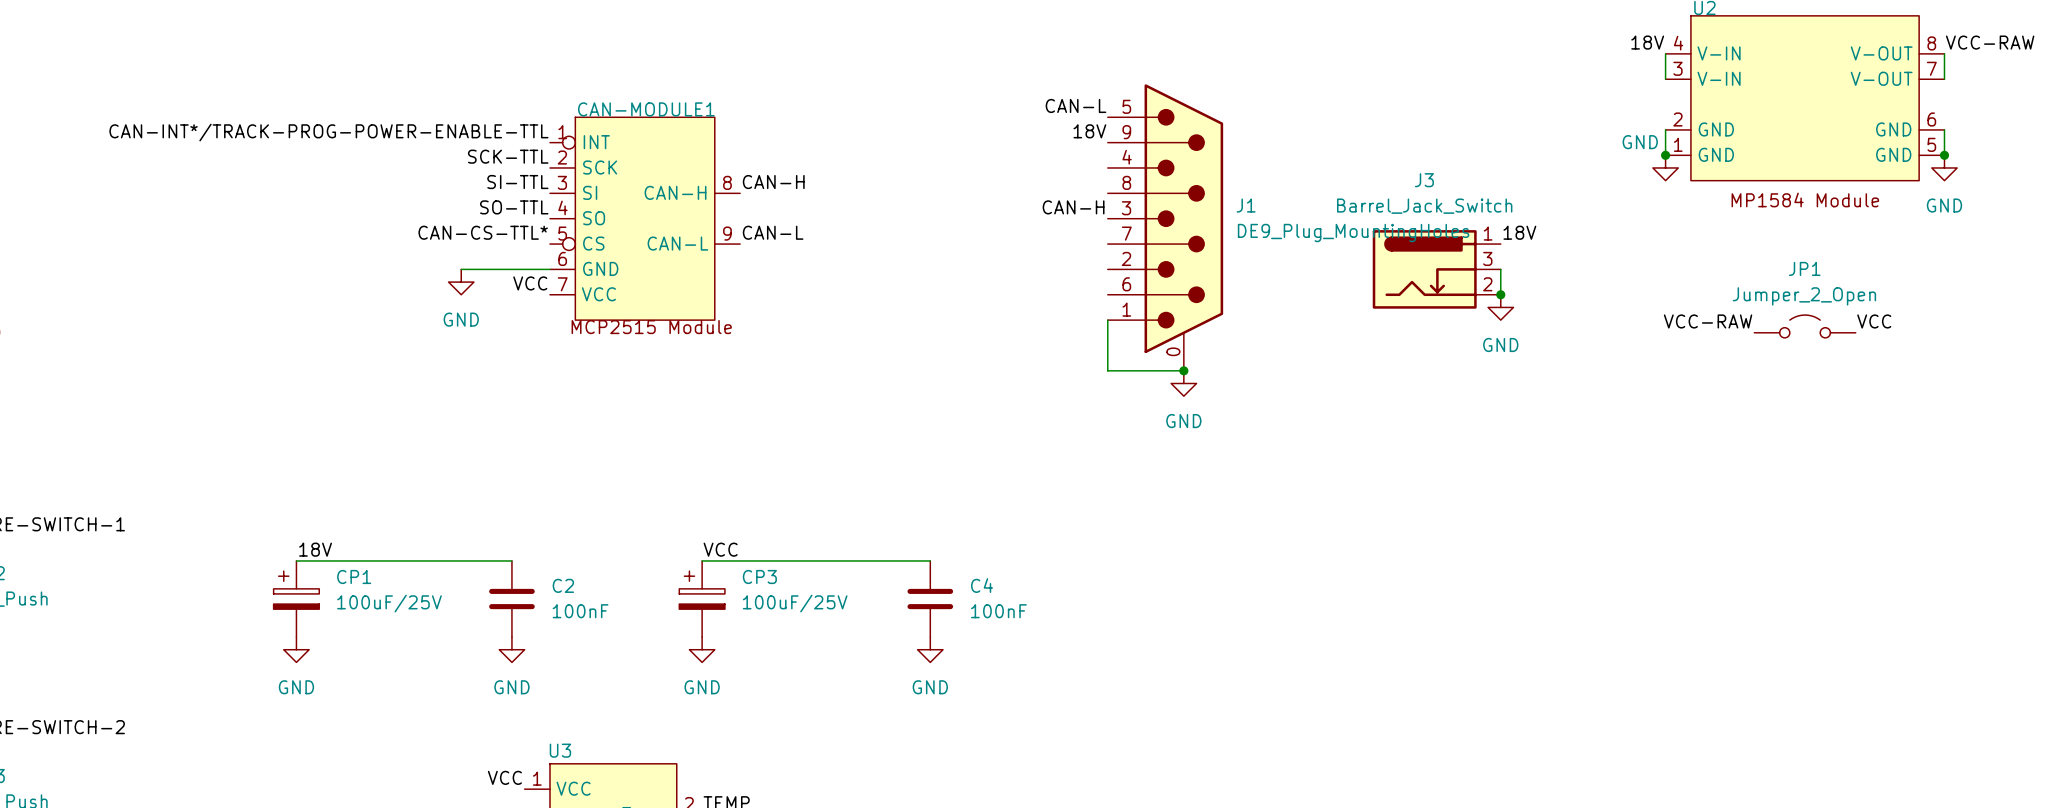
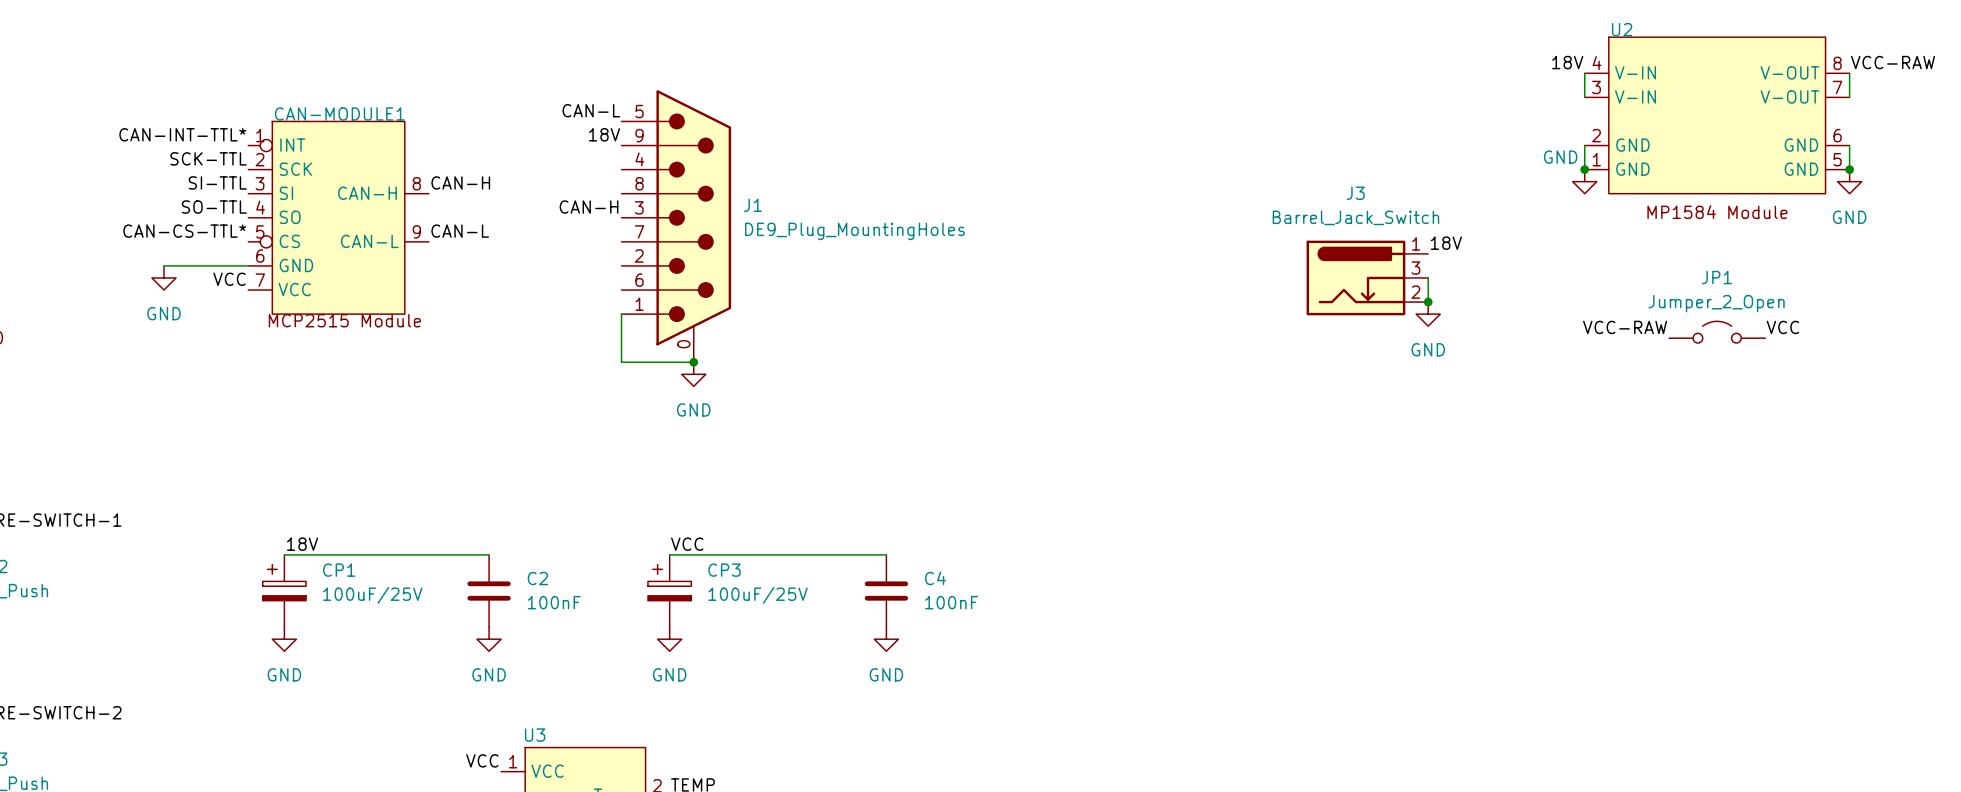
label: none -> CAN-L (591, 110)
label: CAN-L (1075, 105) -> none
label: none -> CAN-INT-TTL* (182, 134)
label: none -> 18V (604, 134)
label: 18V (1089, 131) -> none
label: CAN-INT*/TRACK-PROG-POWER-ENABLE-TTL (328, 132) -> none
label: none -> SCK-TTL (208, 158)
label: SCK-TTL (508, 156) -> none
label: none -> SI-TTL (217, 182)
label: none -> CAN-H (460, 182)
label: SI-TTL (517, 182) -> none
label position: CAN-H (773, 182) -> CAN-H (589, 207)
label: none -> SO-TTL (214, 207)
label: SO-TTL (514, 207) -> none
label: CAN-H (1073, 207) -> none
CAN-MODULE1 position: (645, 218) -> (338, 217)
label: none -> CAN-CS-TTL* (184, 231)
J1 position: (1165, 227) -> (676, 226)
label: CAN-CS-TTL* (483, 232) -> CAN-L (460, 231)
label: CAN-L (773, 232) -> none
wire: none -> (163, 265) (248, 265)
power symbol: none -> GND (163, 277)
wire: (461, 269) (549, 269) -> none
label: none -> VCC (229, 279)
power symbol: GND (461, 282) -> none
label: VCC (530, 283) -> none
wire: none -> (621, 314) (621, 362) (693, 362)
wire: (1107, 320) (1107, 370) (1183, 370) -> none
junction: none -> (693, 362)
power symbol: none -> GND (693, 374)
junction: (1183, 370) -> none
power symbol: GND (1183, 383) -> none

